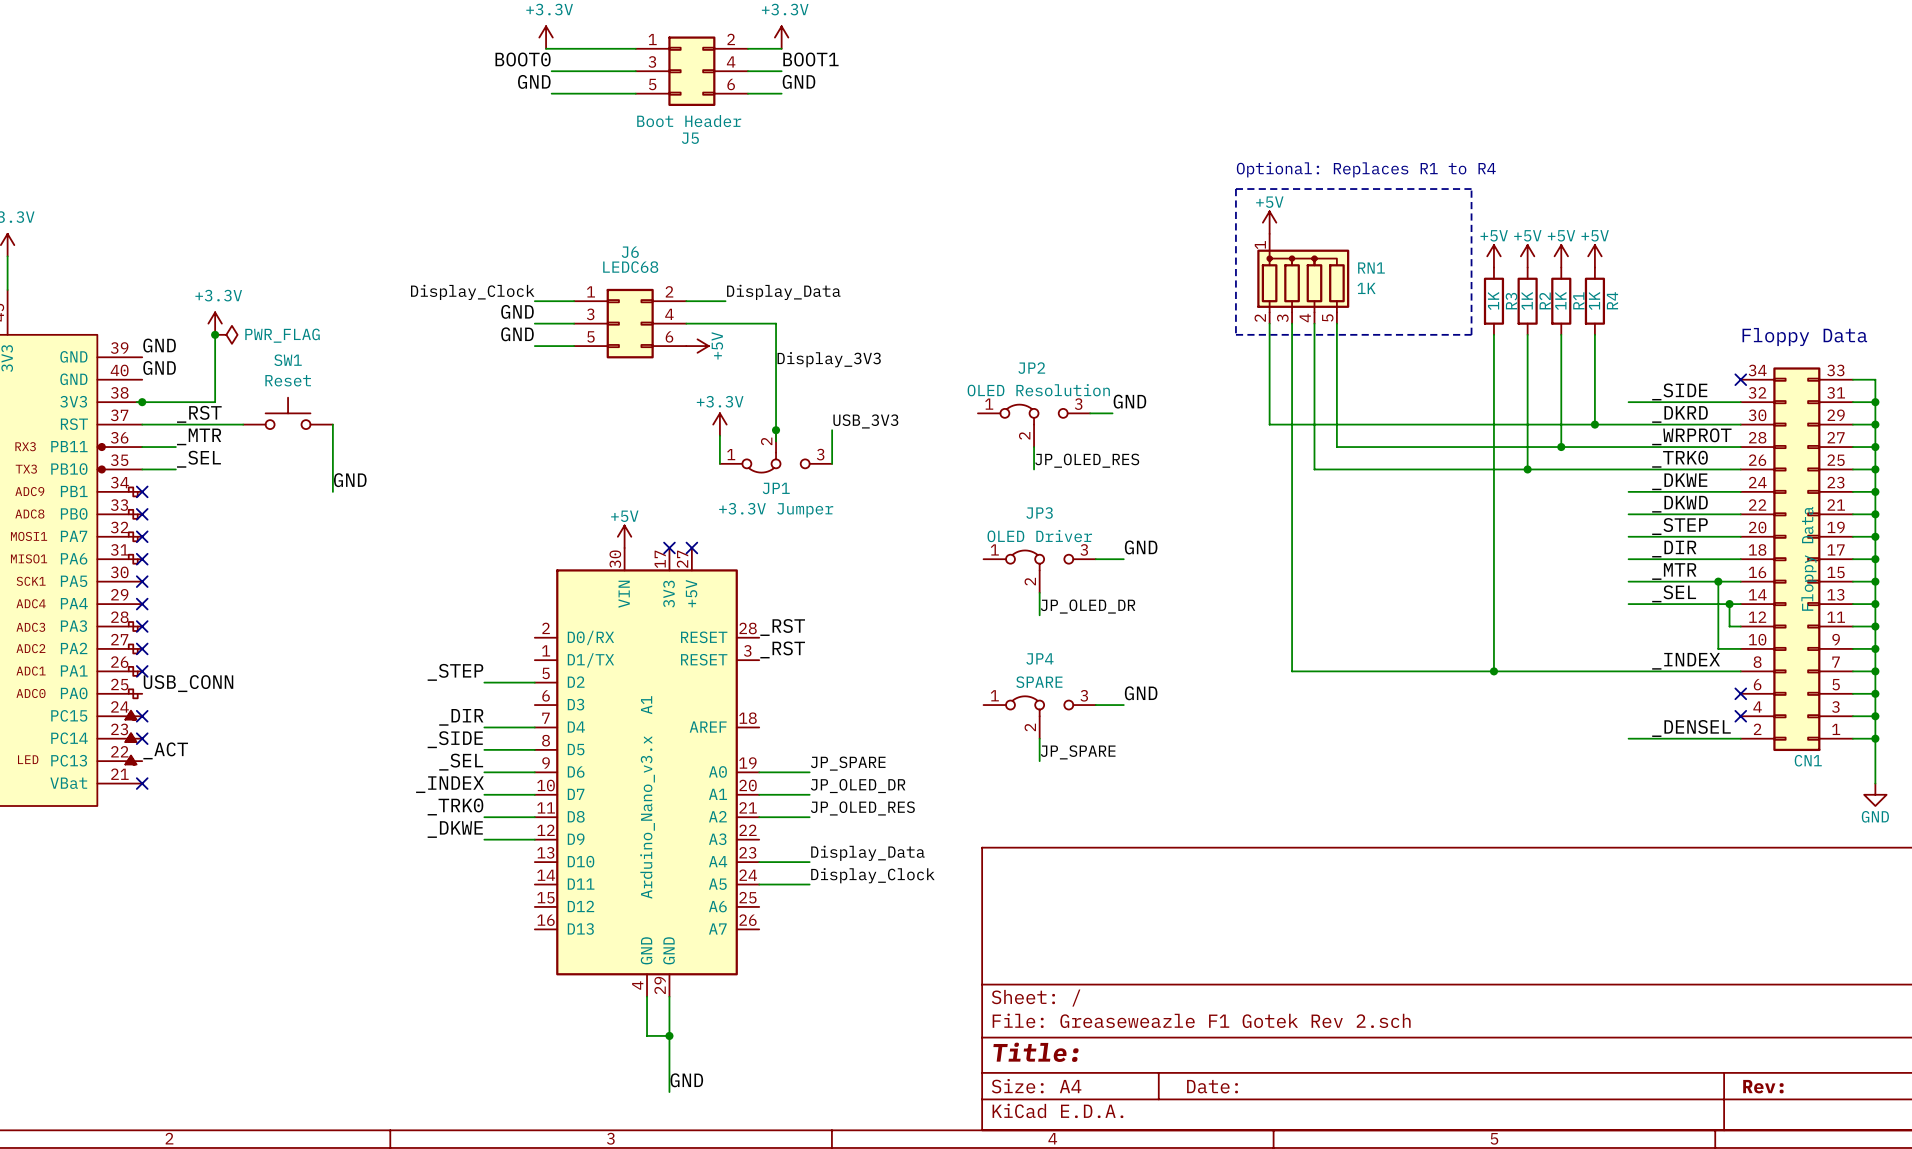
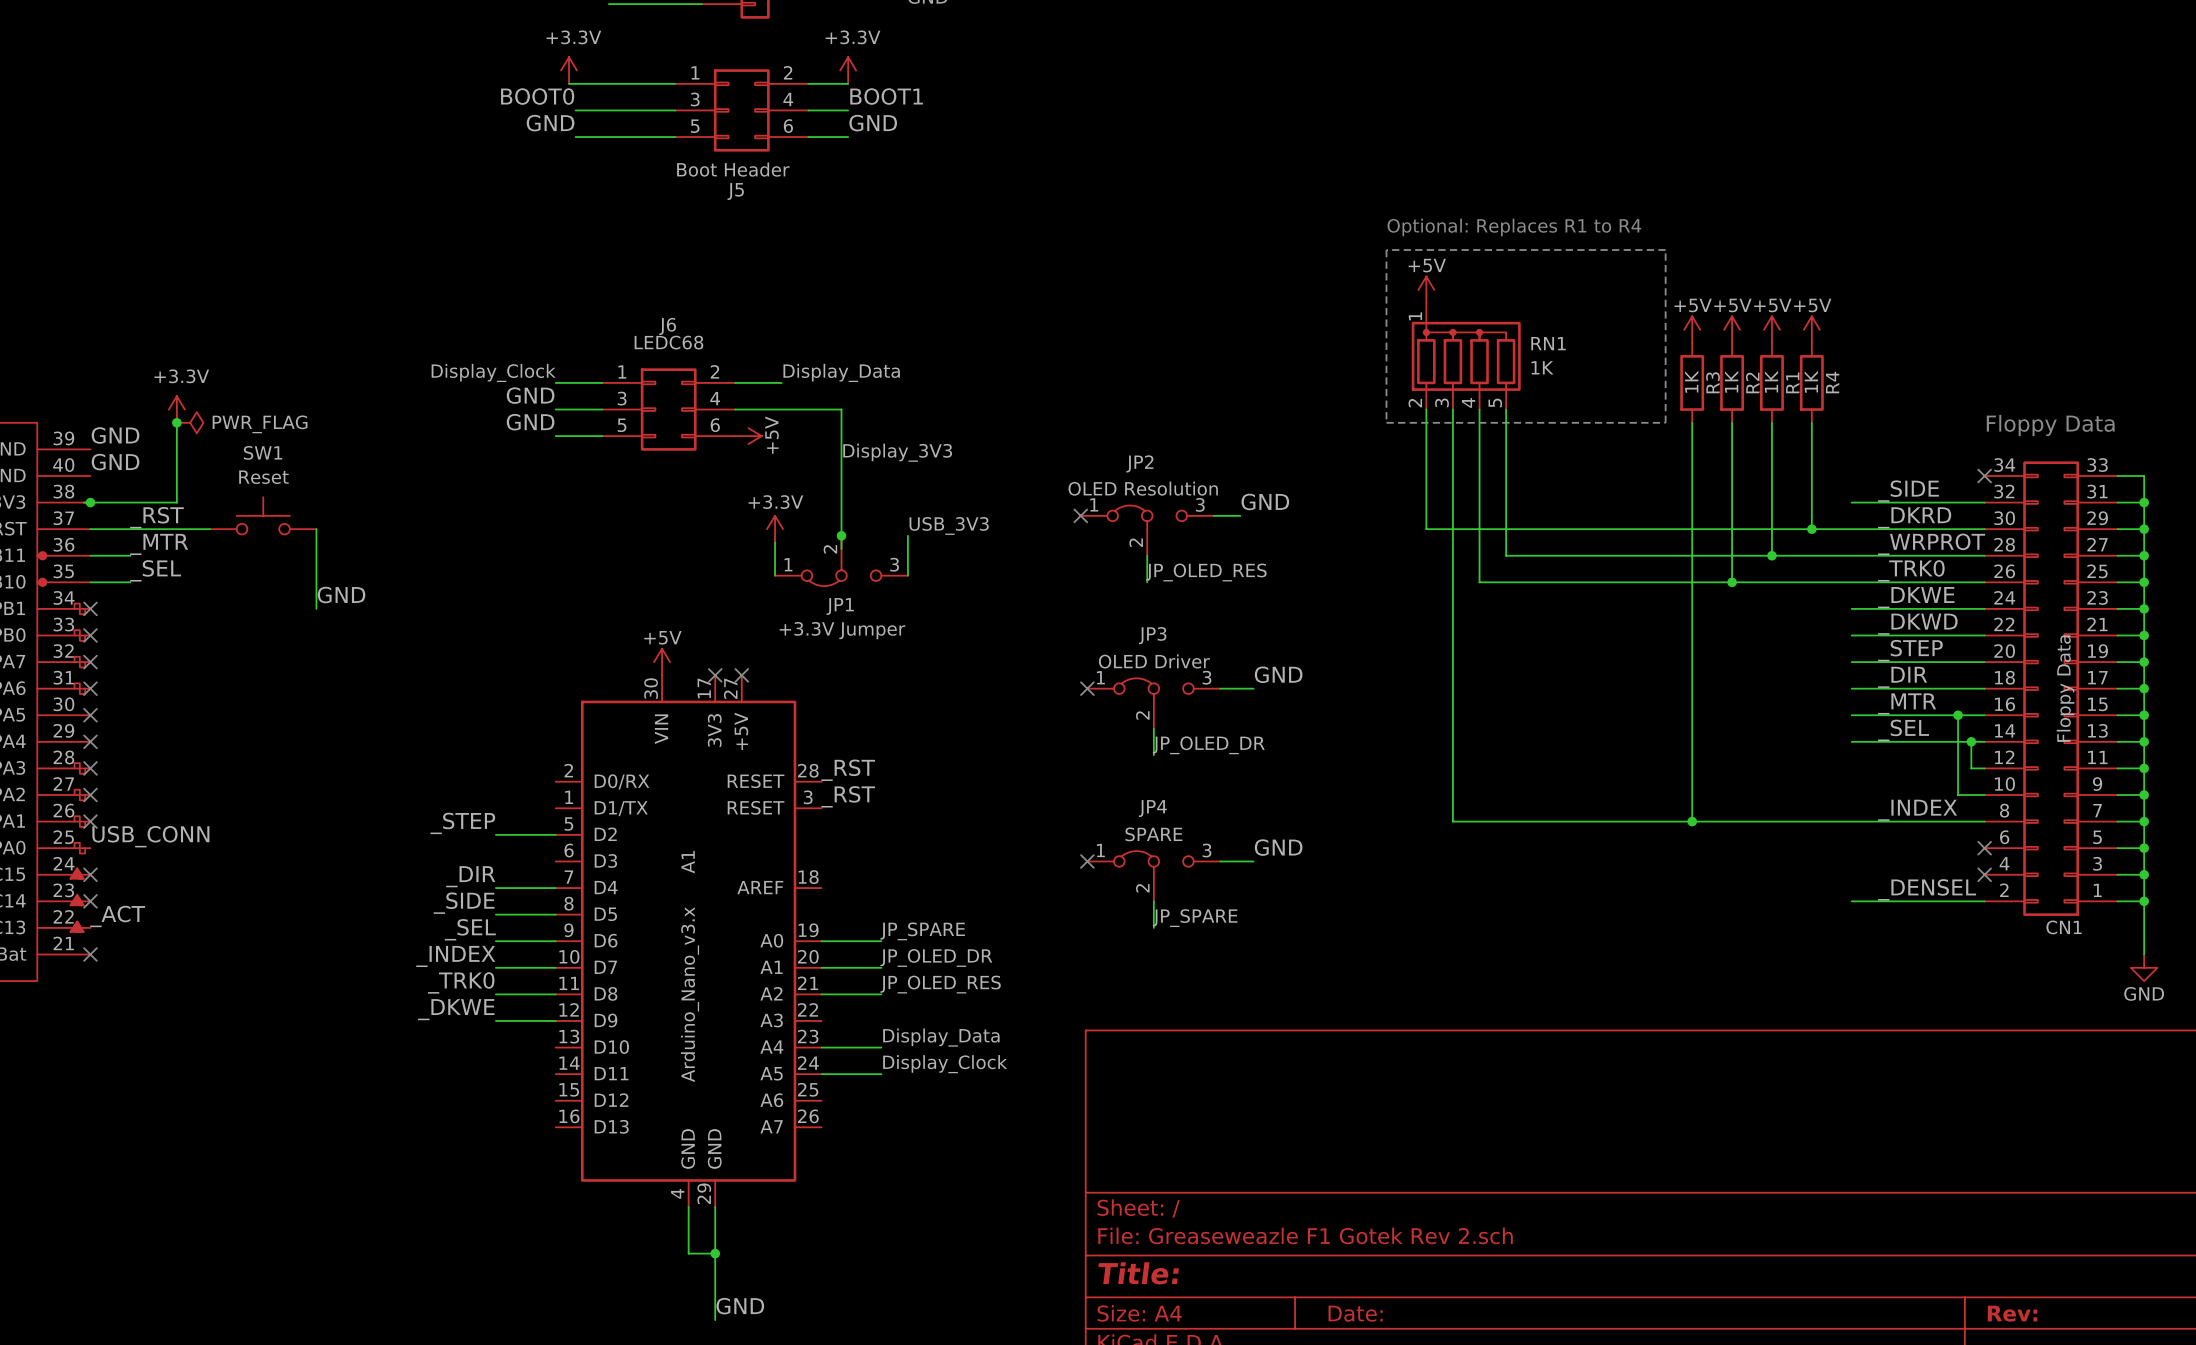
no-connect mark: none -> (1080, 515)
no-connect mark: none -> (1087, 688)
no-connect mark: none -> (1087, 861)

